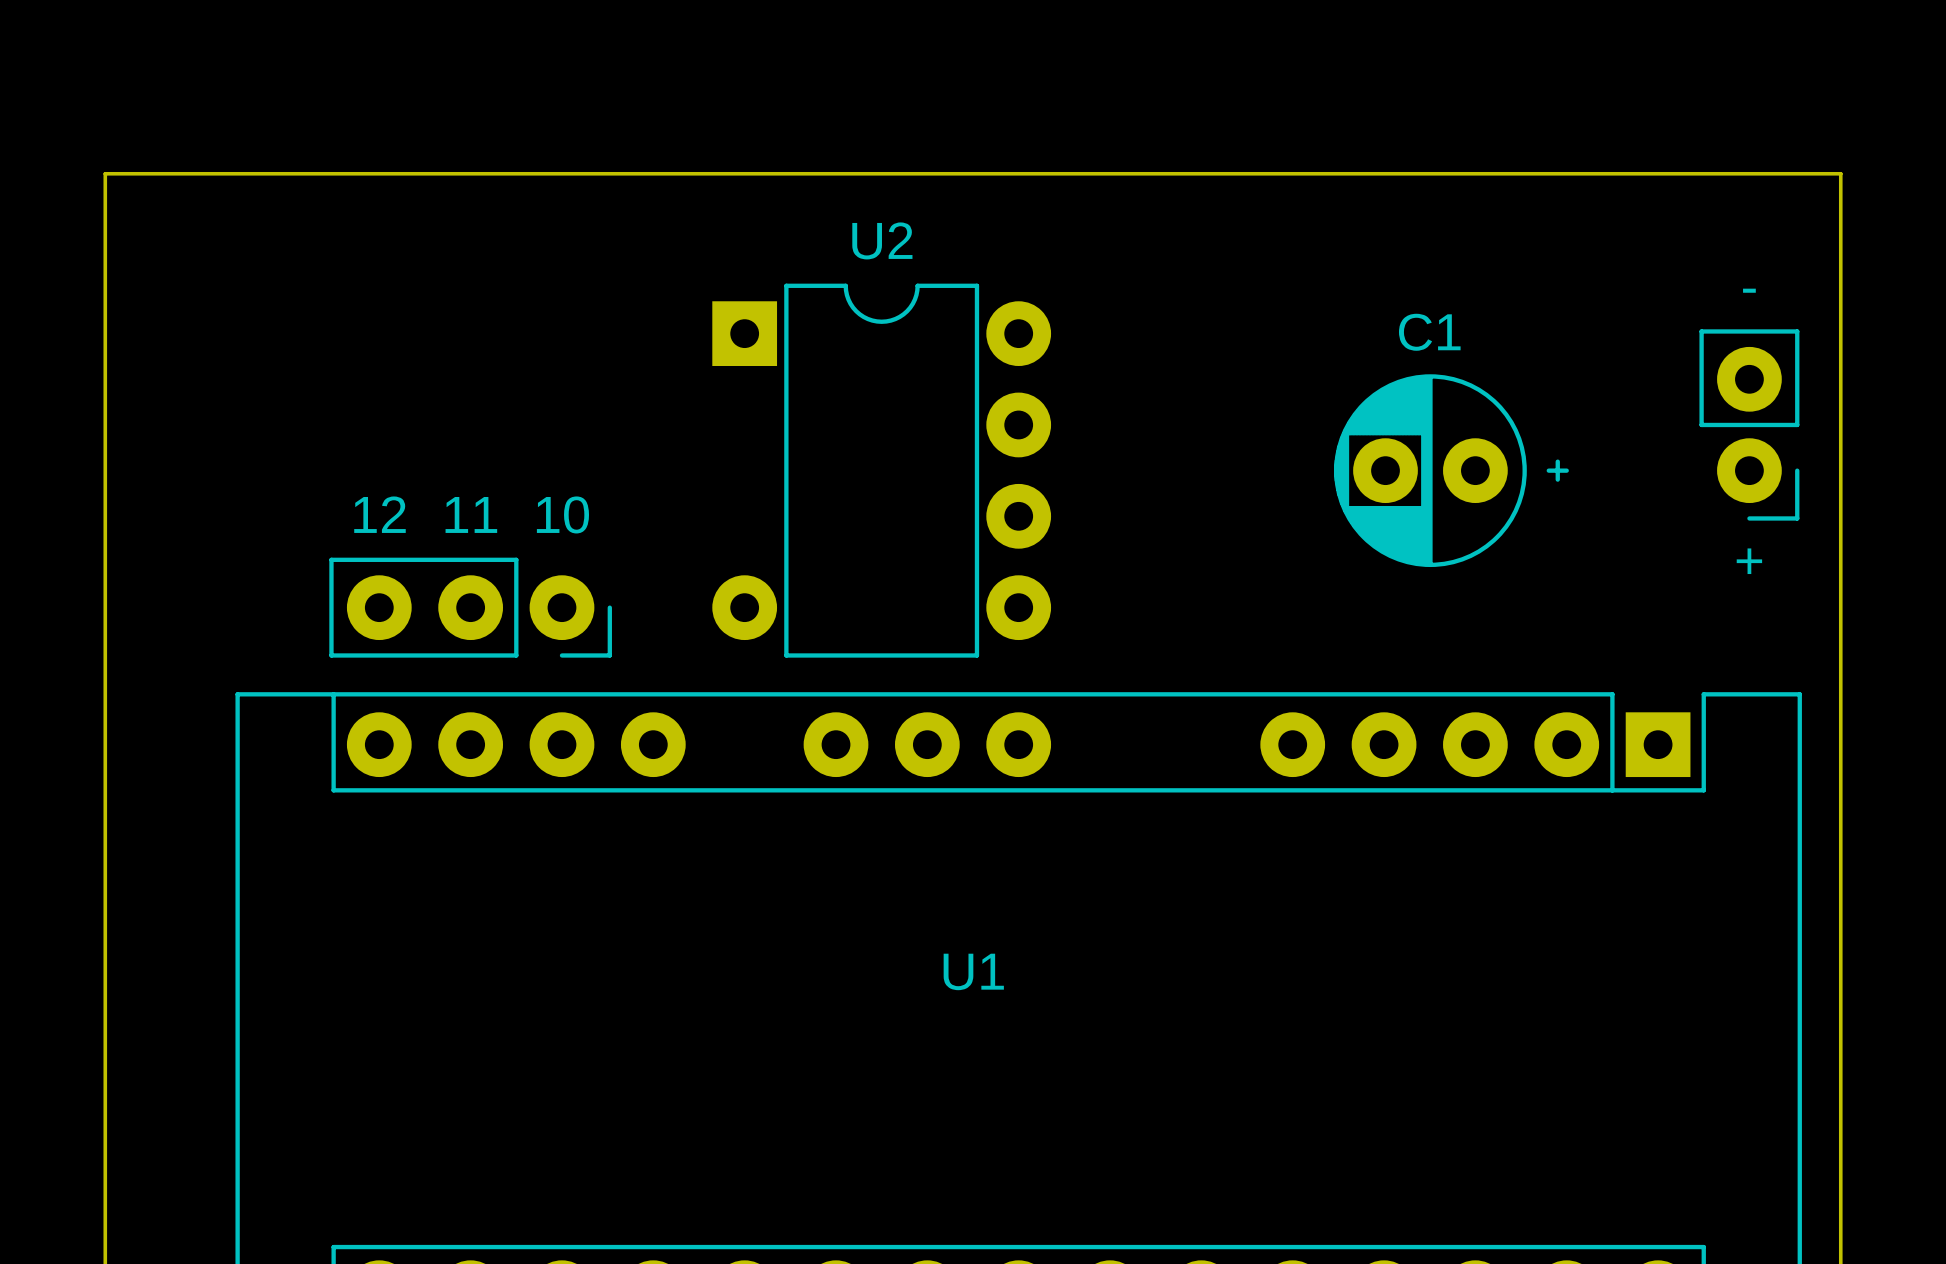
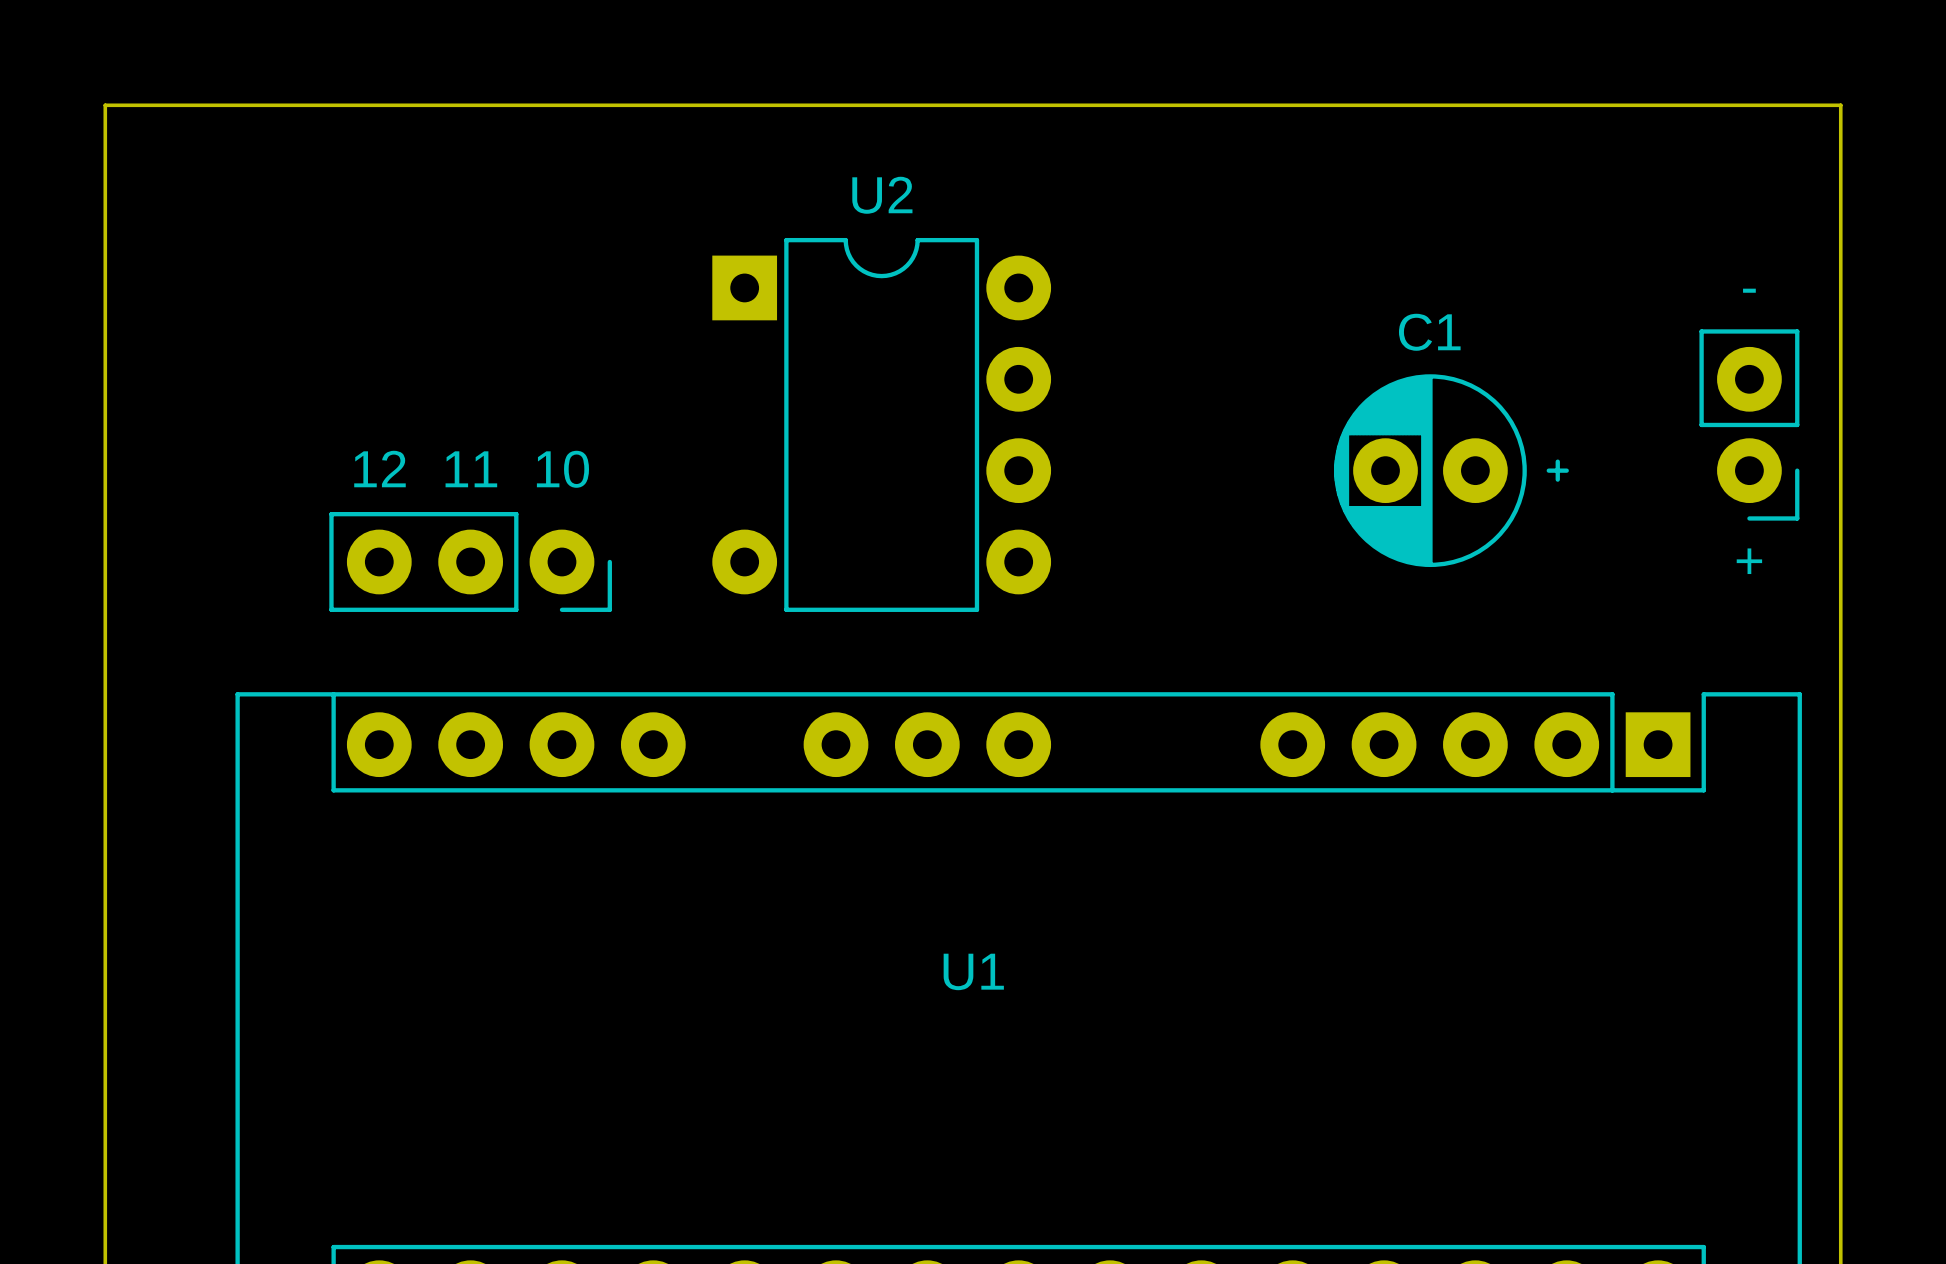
board edge: (105, 173) (1840, 173) -> (105, 173) (105, 105) (1840, 105) (1840, 173)
U2 position: (881, 470) -> (881, 424)
text position: 12 (379, 514) -> 12 (379, 469)
text position: 11 (471, 514) -> 11 (471, 469)
text position: 10 (562, 514) -> 10 (562, 469)
part position: (470, 607) -> (470, 561)

